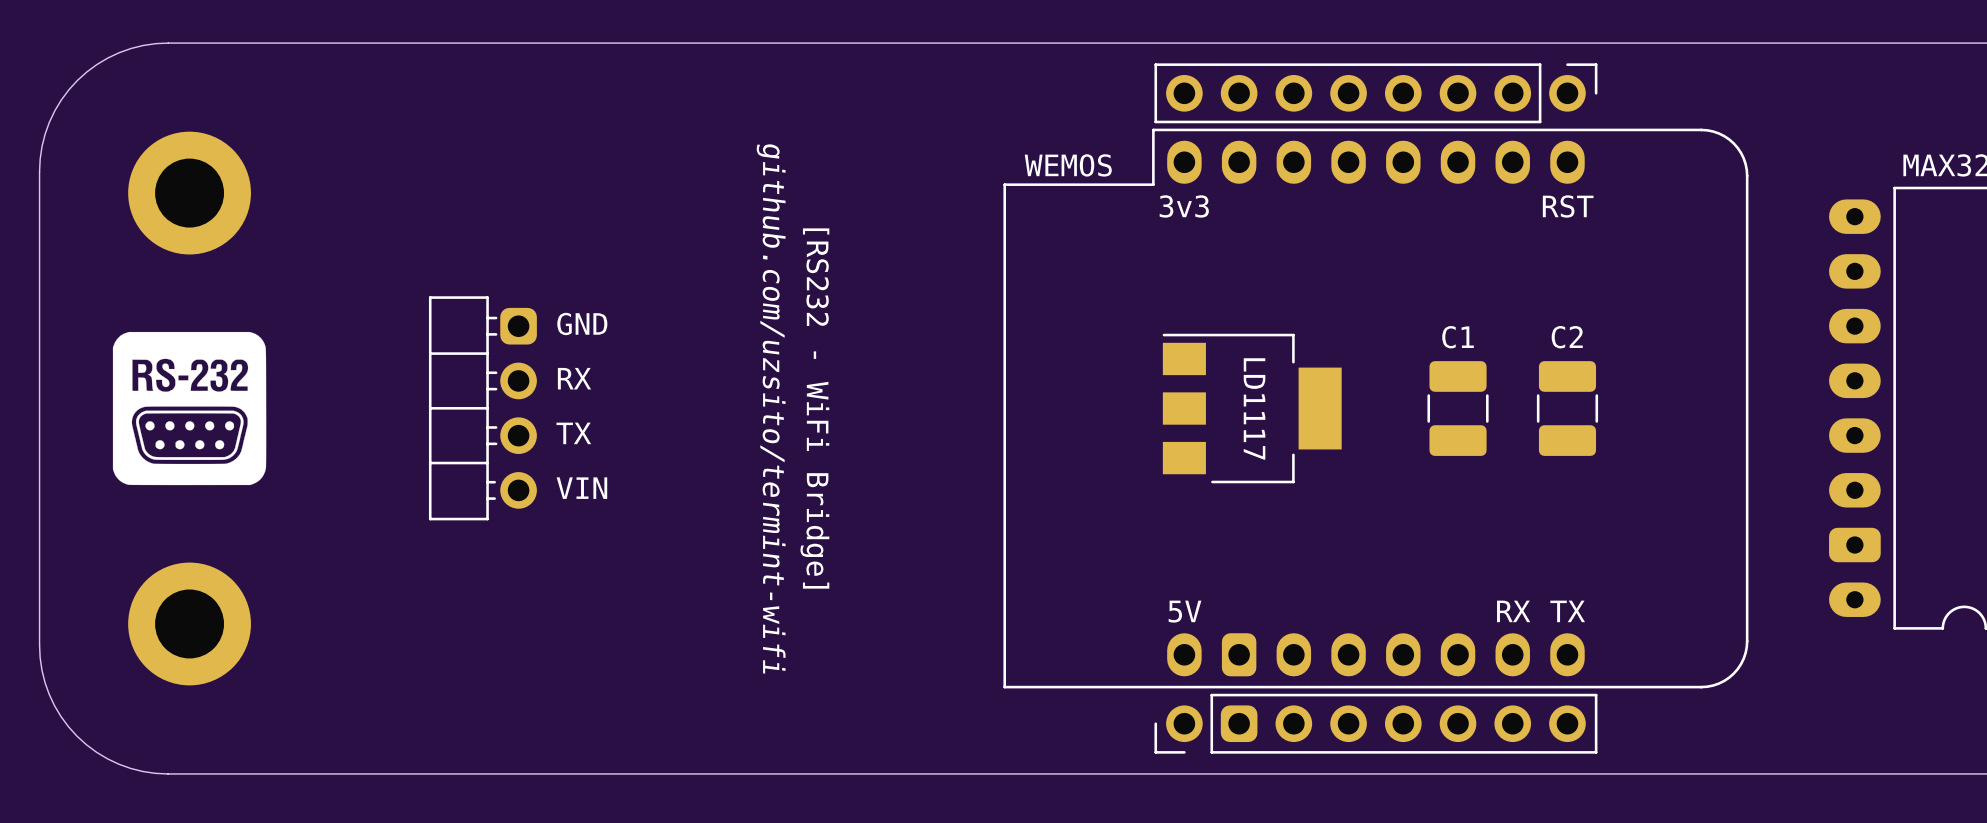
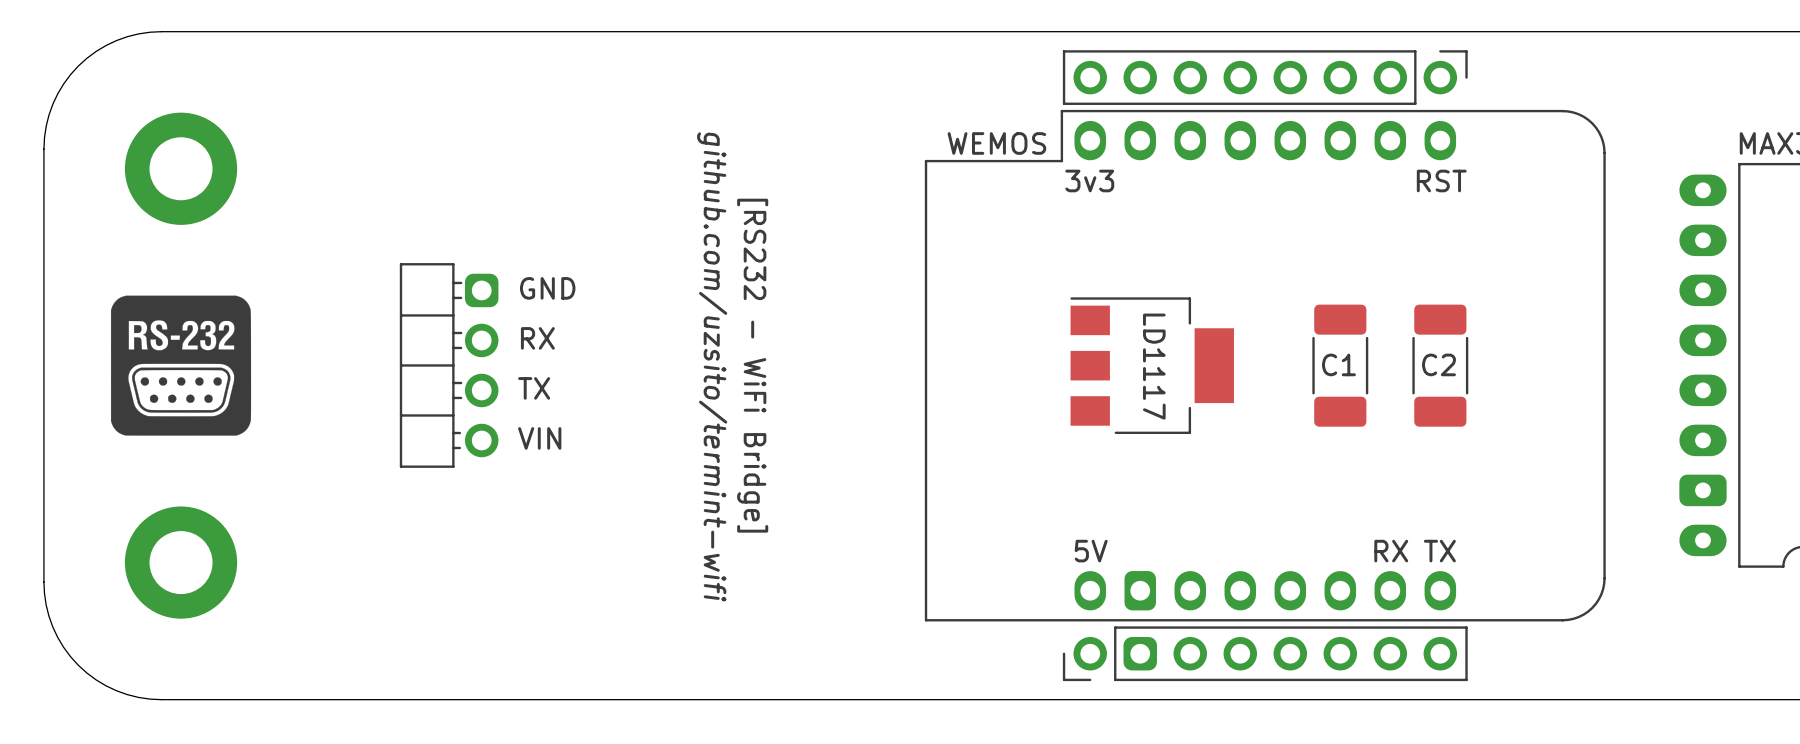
C1 name position: C1 (1458, 337) -> C1 (1338, 364)
C2 name position: C2 (1567, 337) -> C2 (1438, 364)
C1 footprint: [1427, 361, 1489, 456] -> [1312, 304, 1369, 427]
C2 footprint: [1536, 361, 1599, 456] -> [1412, 304, 1469, 427]

